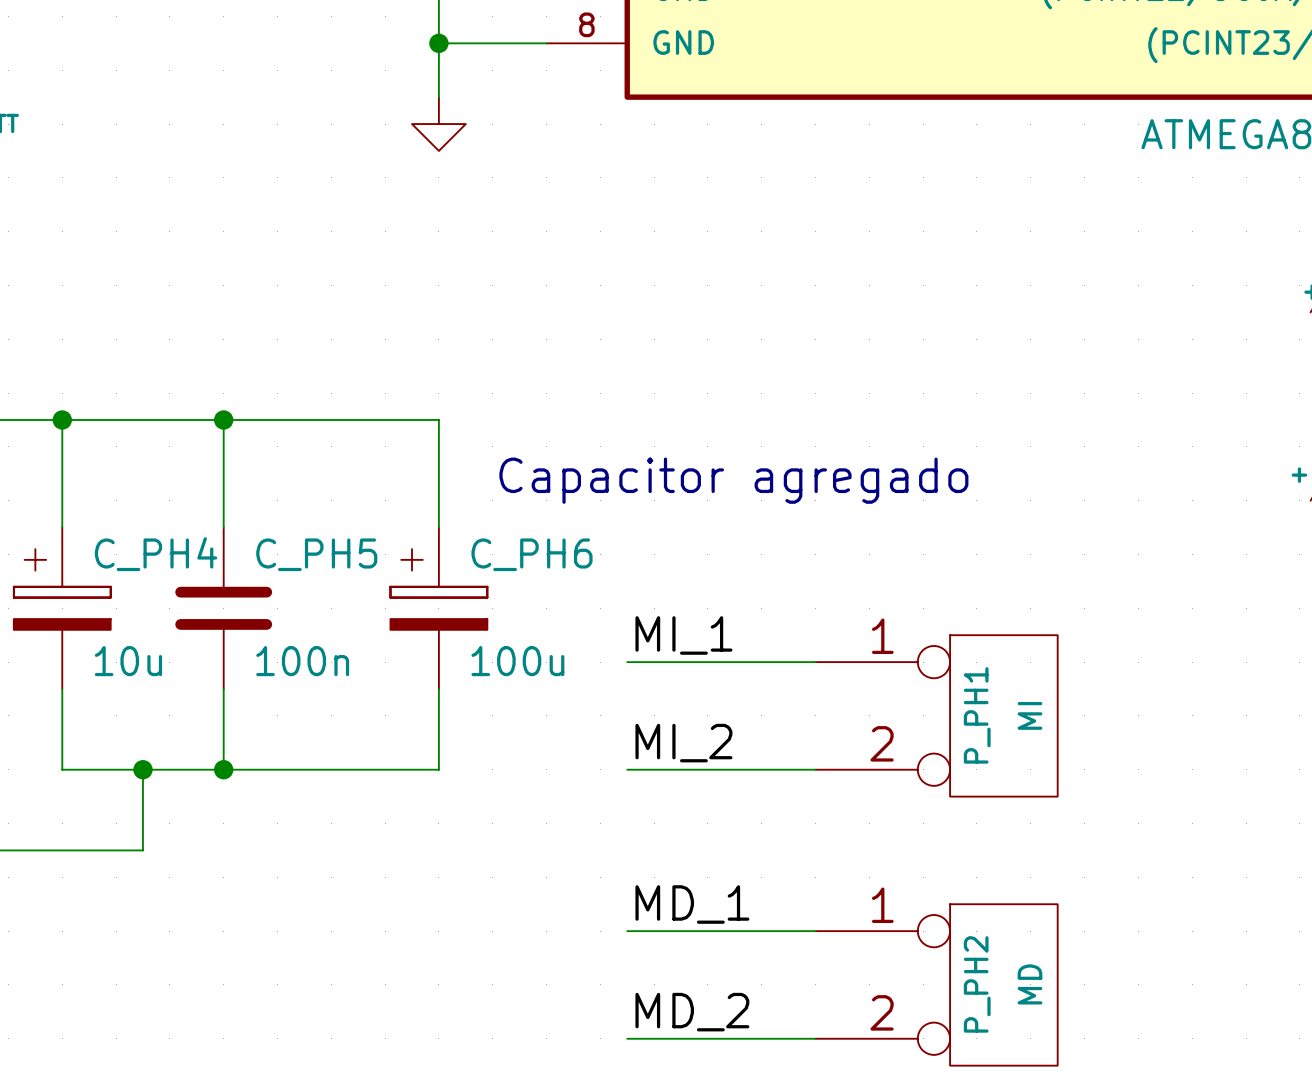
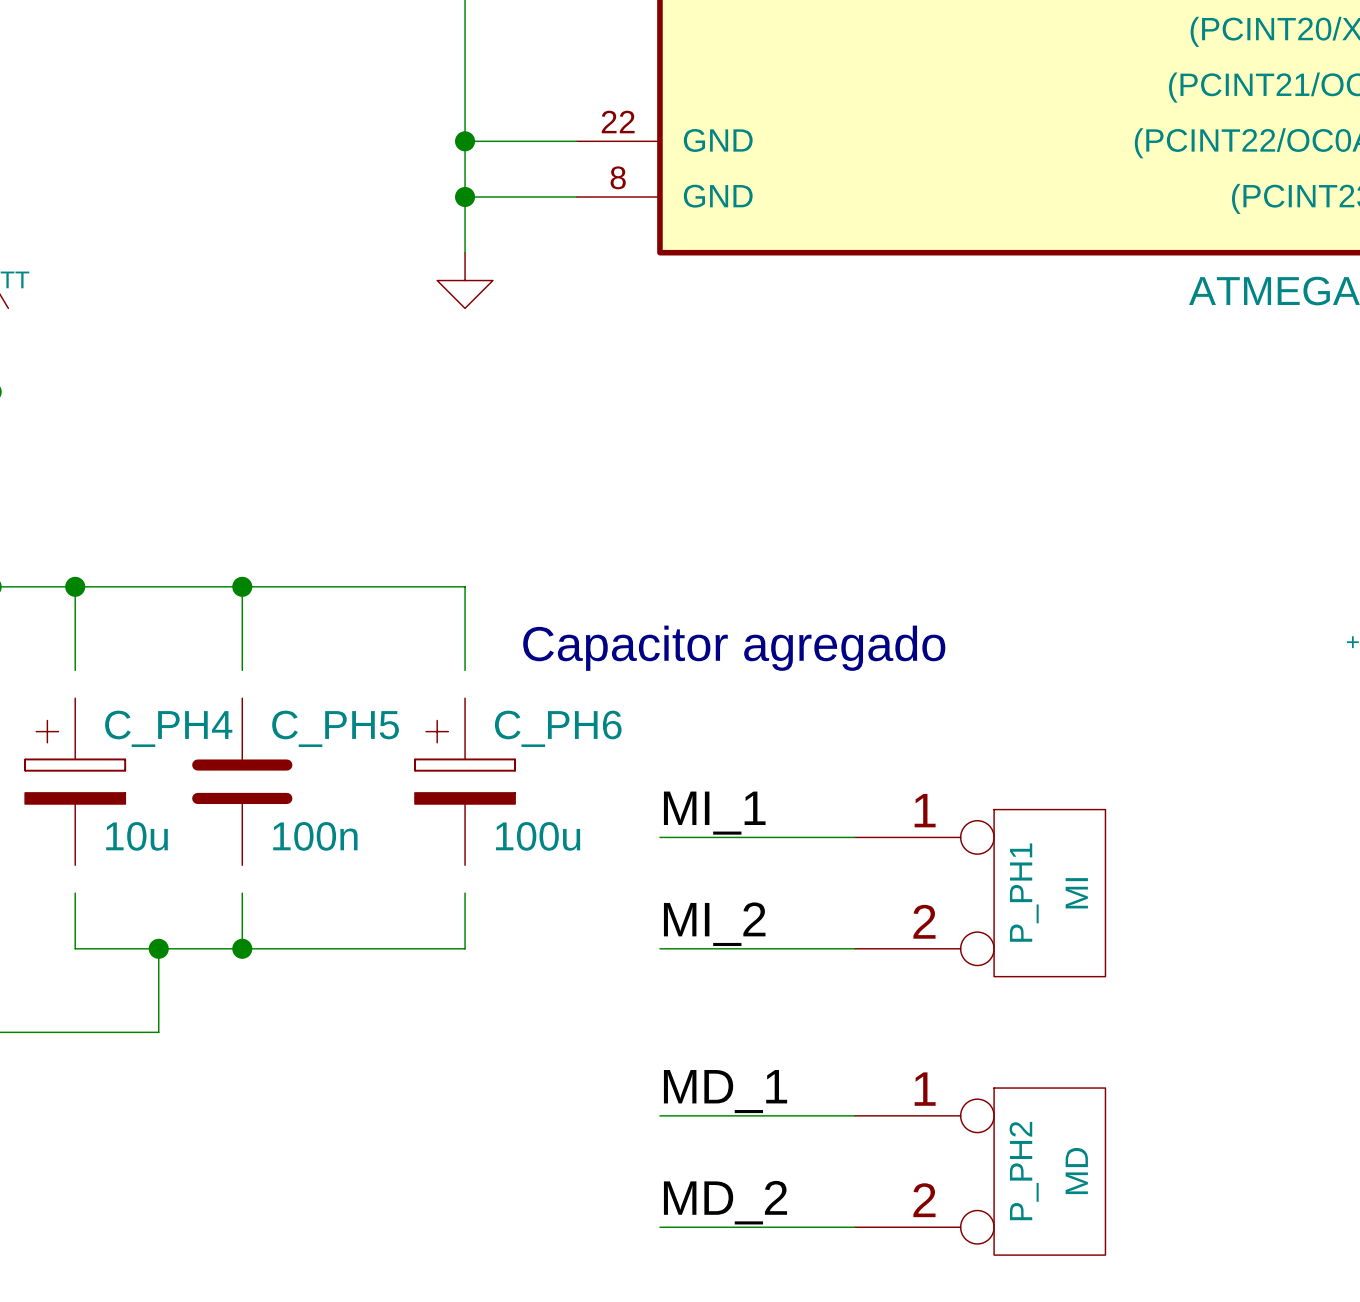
wire: (62, 500) (62, 527) -> none
wire: (223, 500) (223, 527) -> none
wire: (438, 500) (438, 527) -> none
wire: (62, 689) (62, 715) -> none
wire: (223, 689) (223, 715) -> none
wire: (438, 689) (438, 715) -> none

